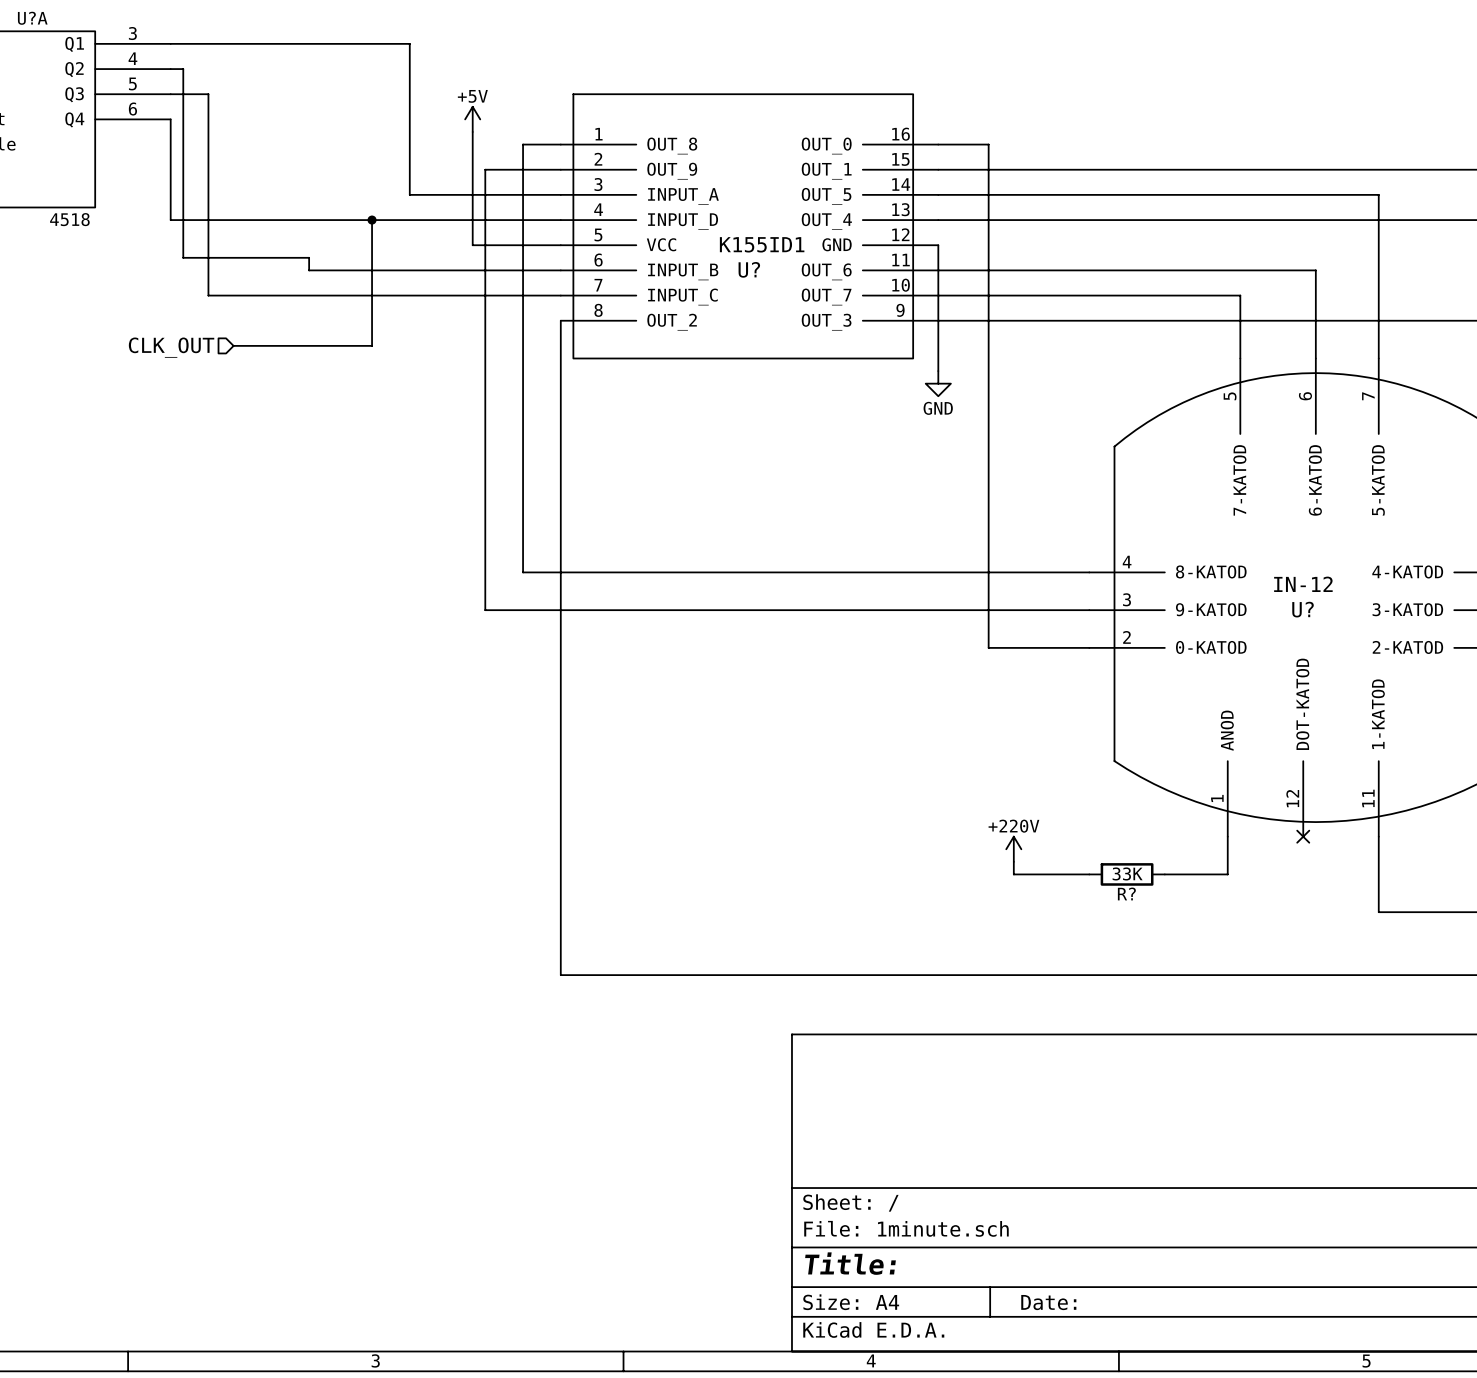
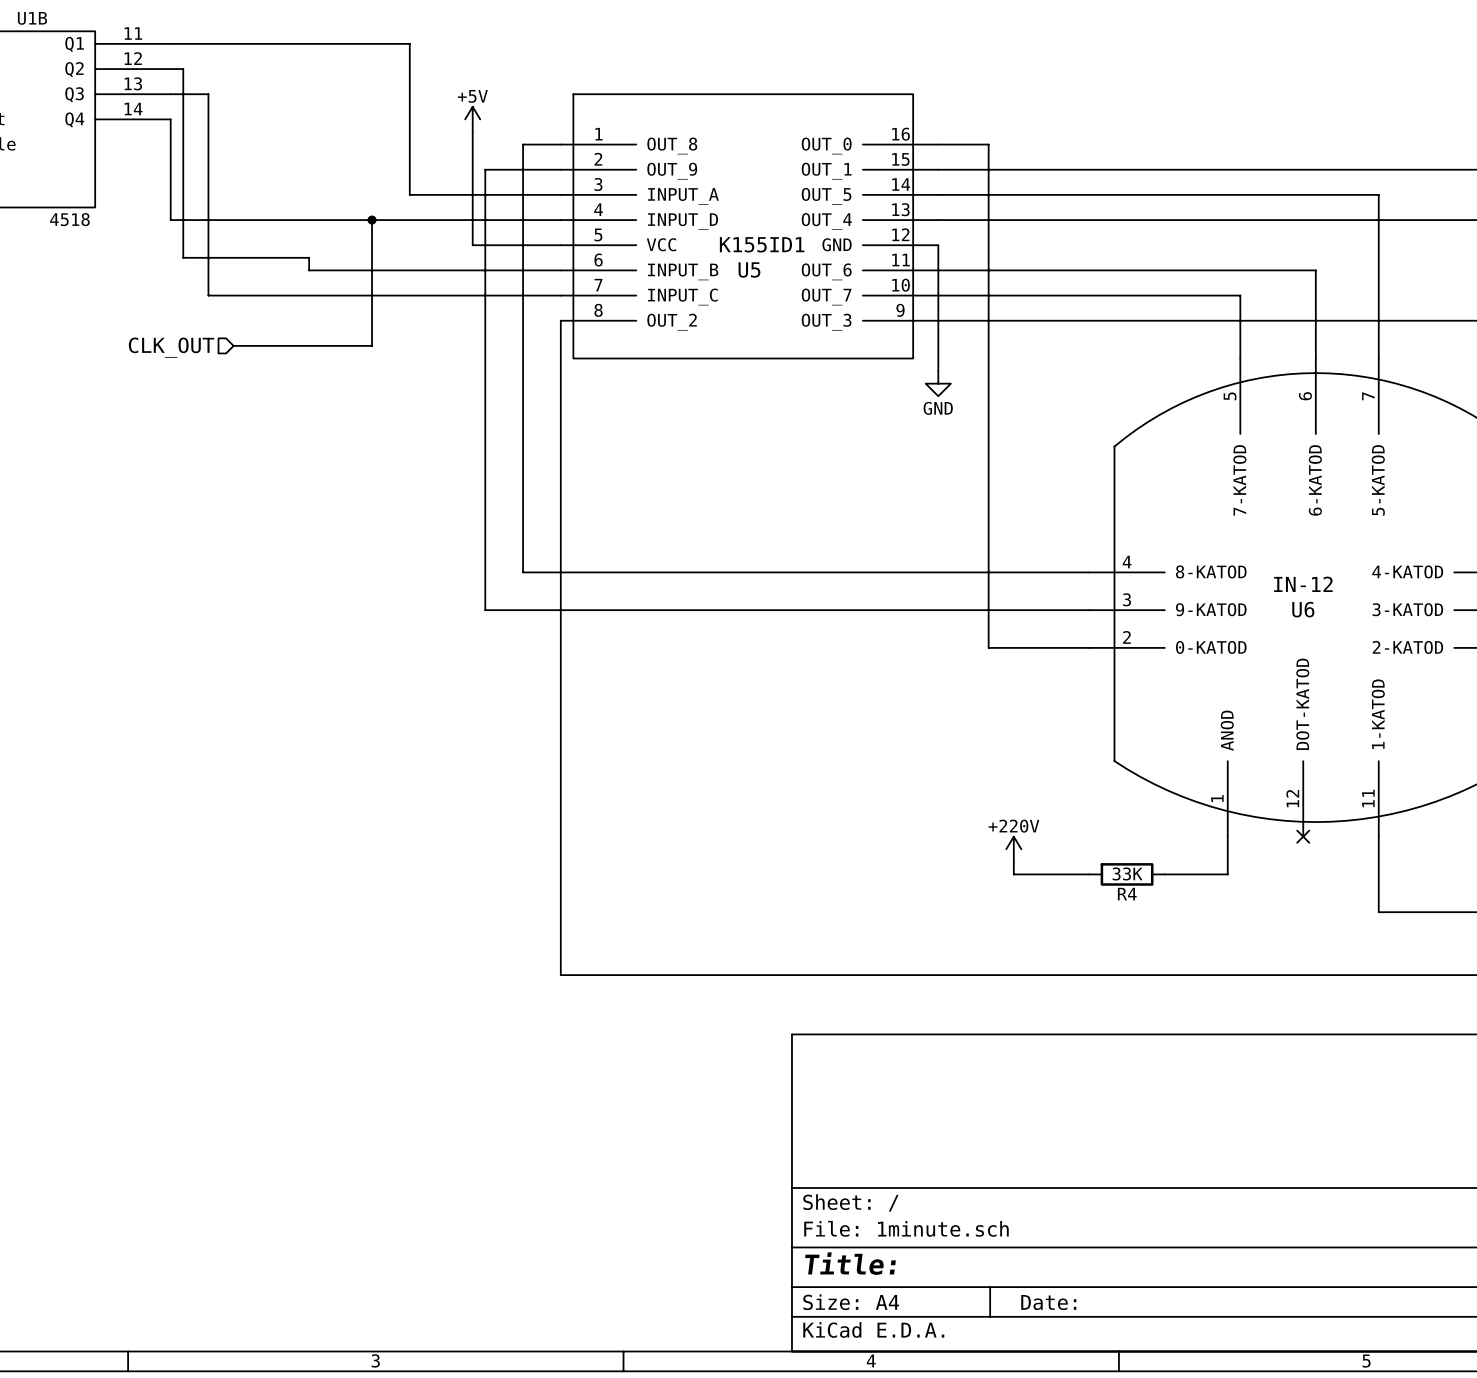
U?A name: U?A (32, 18) -> U1B (32, 18)
U?A pin number: 3 (132, 33) -> 11 (133, 33)
U?A pin number: 4 (132, 58) -> 12 (133, 58)
U?A pin number: 5 (132, 83) -> 13 (133, 83)
U?A pin number: 6 (132, 109) -> 14 (133, 109)
U? name: U? (749, 269) -> U5 (749, 269)
U? name: U? (1303, 609) -> U6 (1303, 609)
R? name: R? (1126, 893) -> R4 (1127, 894)

